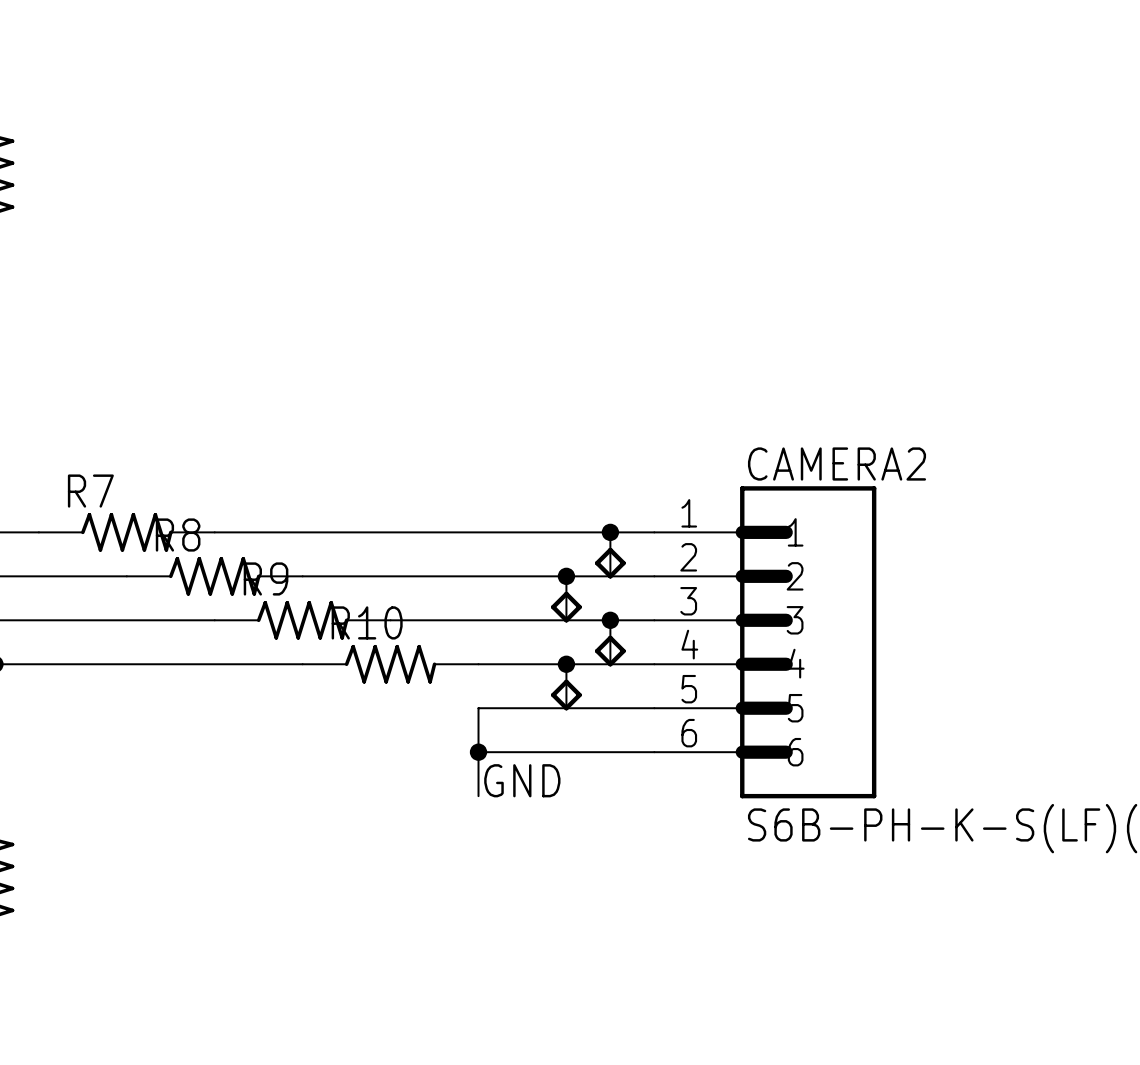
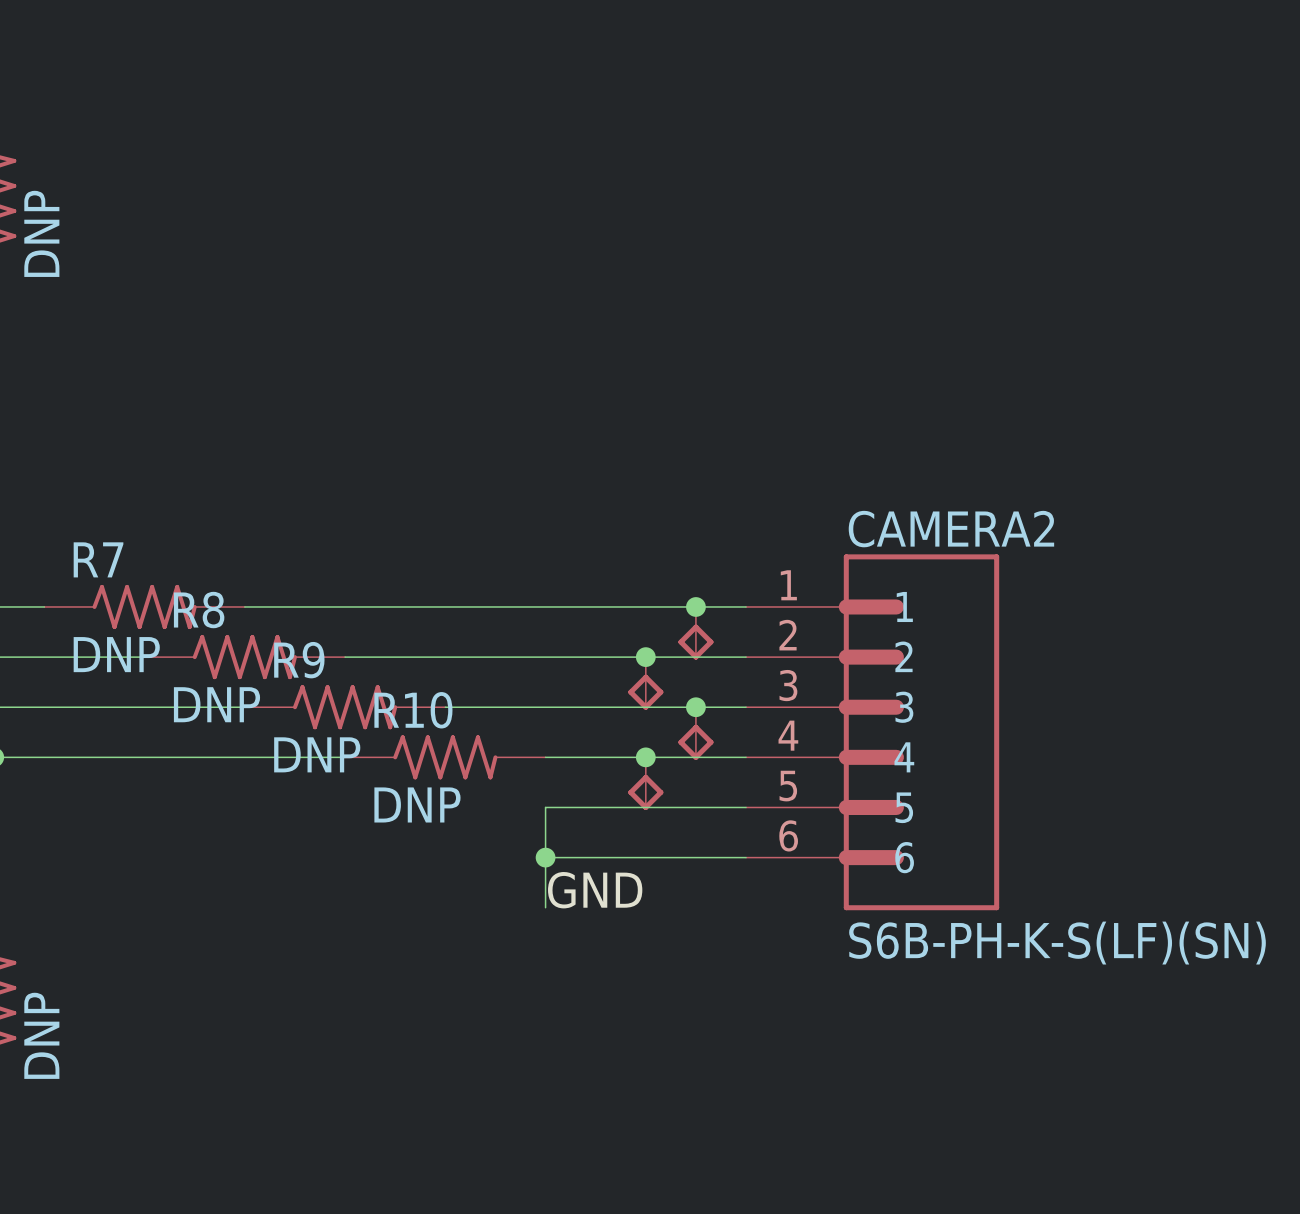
part value: none -> DNP (41, 233)
R7 value: none -> DNP (116, 654)
R8 value: none -> DNP (216, 704)
R9 value: none -> DNP (317, 754)
R10 value: none -> DNP (417, 804)
part value: none -> DNP (41, 1035)

